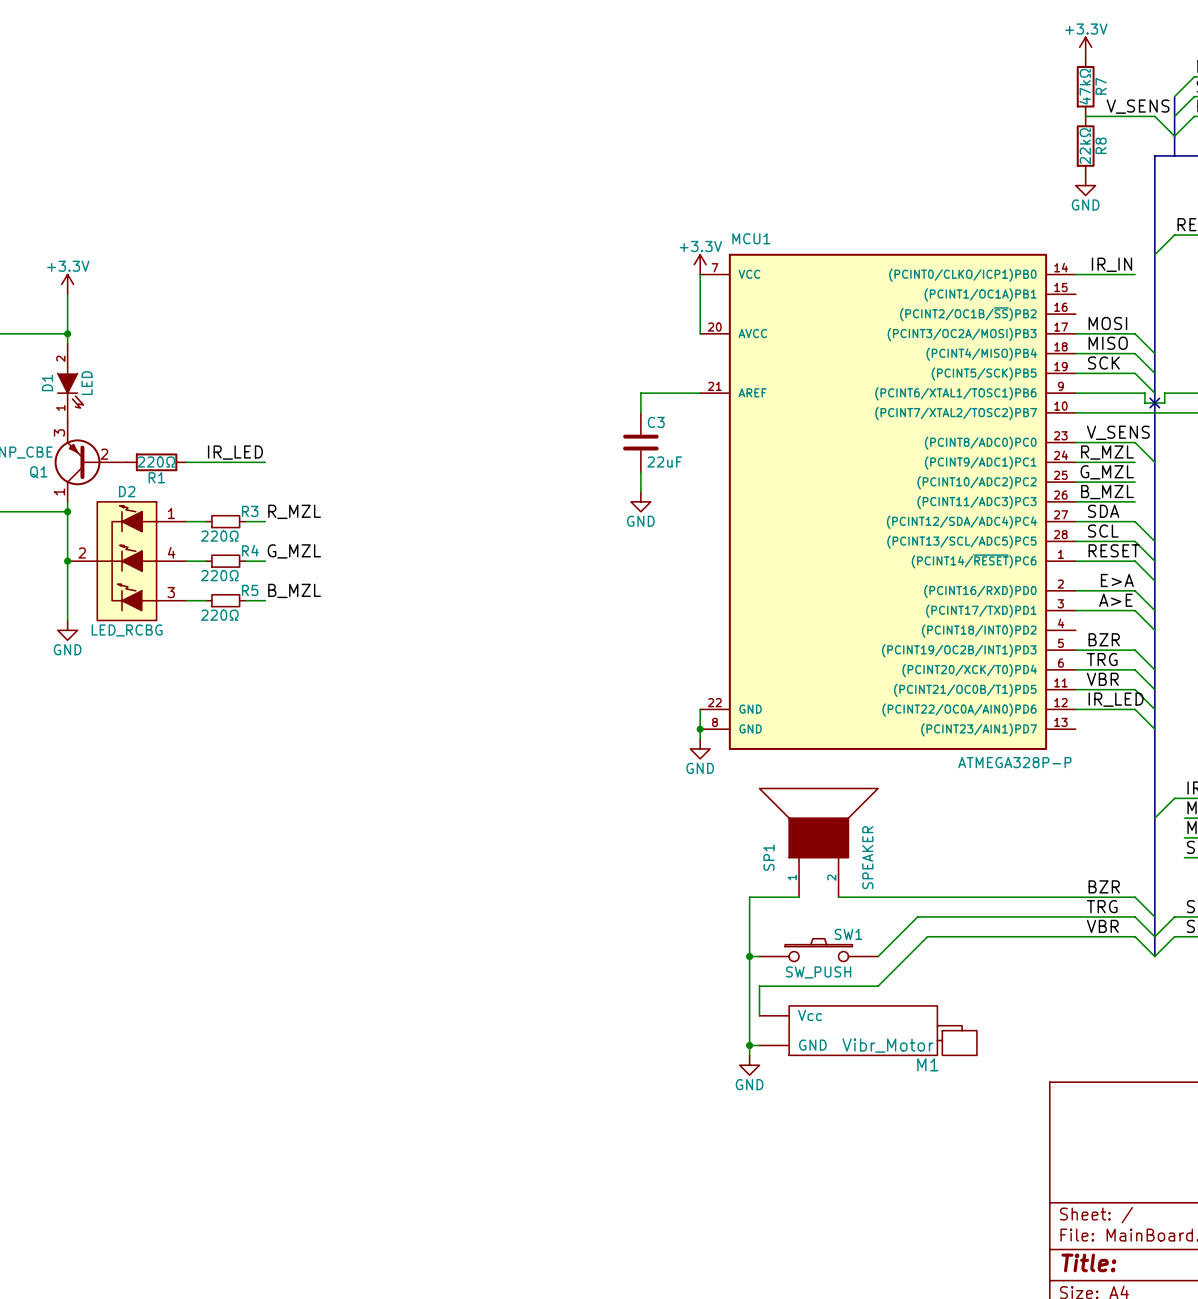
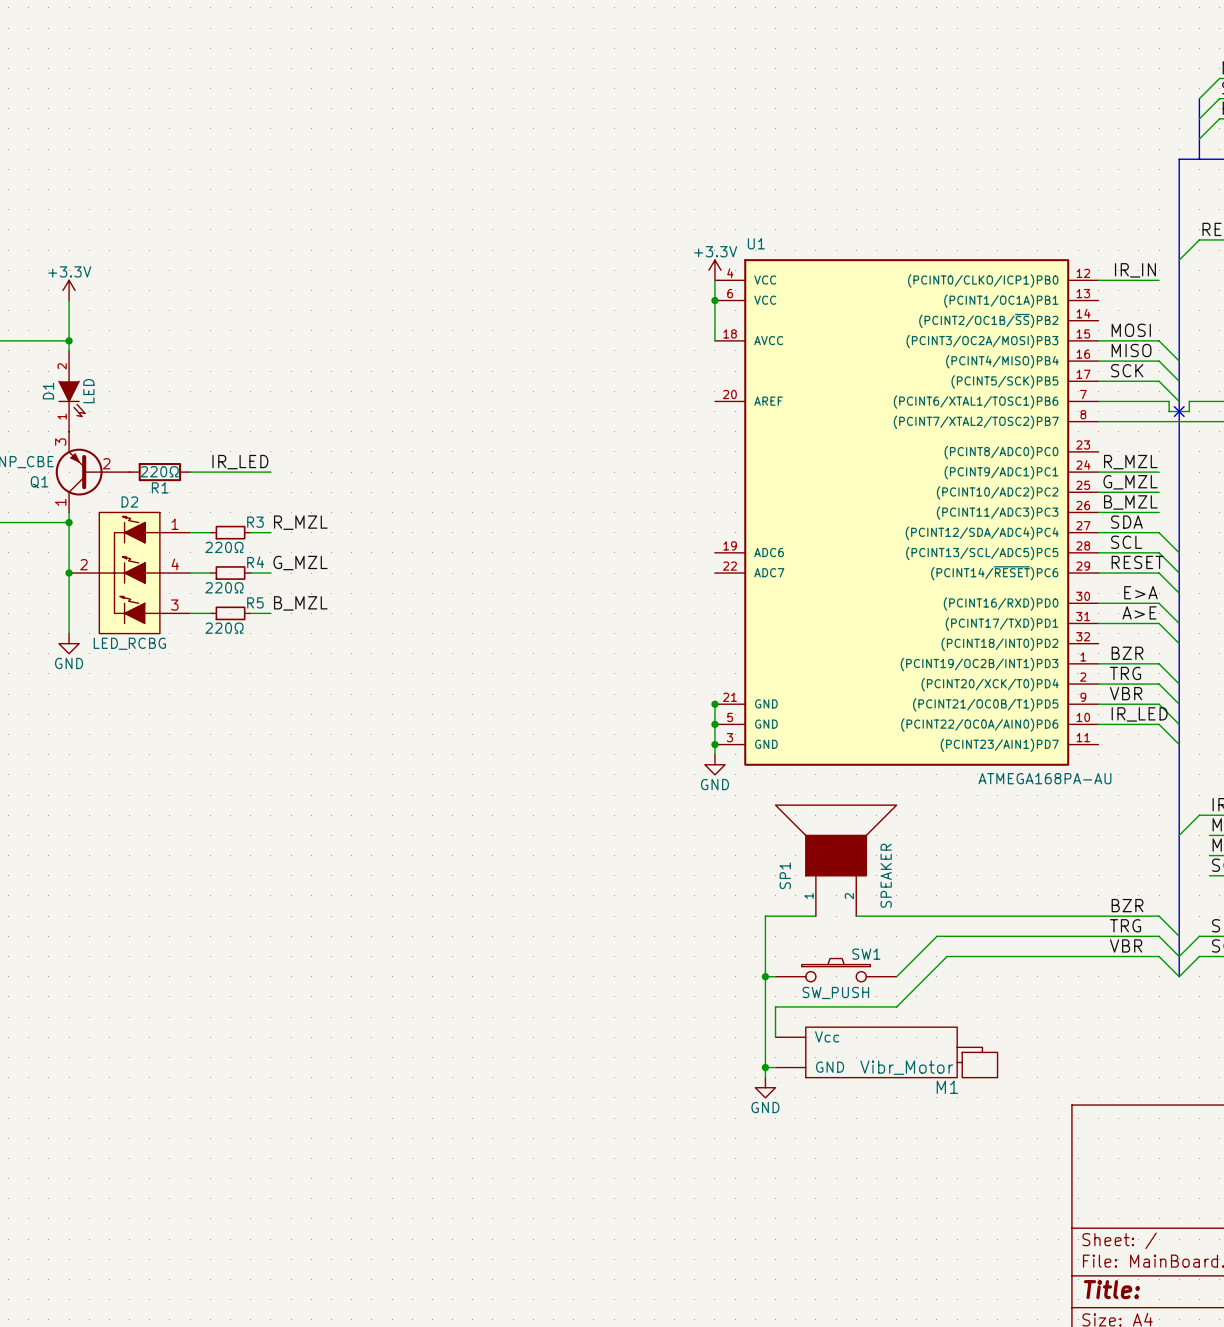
power symbol: +3.3V (1085, 47) -> none
R7: 47kΩ (1085, 86) -> none
label: V_SENS (1138, 106) -> none
wire: (1085, 116) (1154, 116) (1174, 136) -> none
R8: 22kΩ (1085, 146) -> none
power symbol: GND (1085, 185) -> none
junction: none -> (714, 300)
wire: (700, 393) (640, 393) (640, 412) -> none
label: V_SENS (1118, 432) -> none
C3: 22uF (640, 442) -> none
wire: (1075, 442) (1135, 442) (1154, 462) -> none
wire: (640, 472) (640, 491) -> none
power symbol: GND (640, 501) -> none
MCU1: ATMEGA328P-P (887, 501) -> none
U1: none -> ATMEGA168PA-AU (906, 512)
wire: none -> (714, 704) (714, 724)
junction: none -> (714, 704)
junction: none -> (714, 724)

